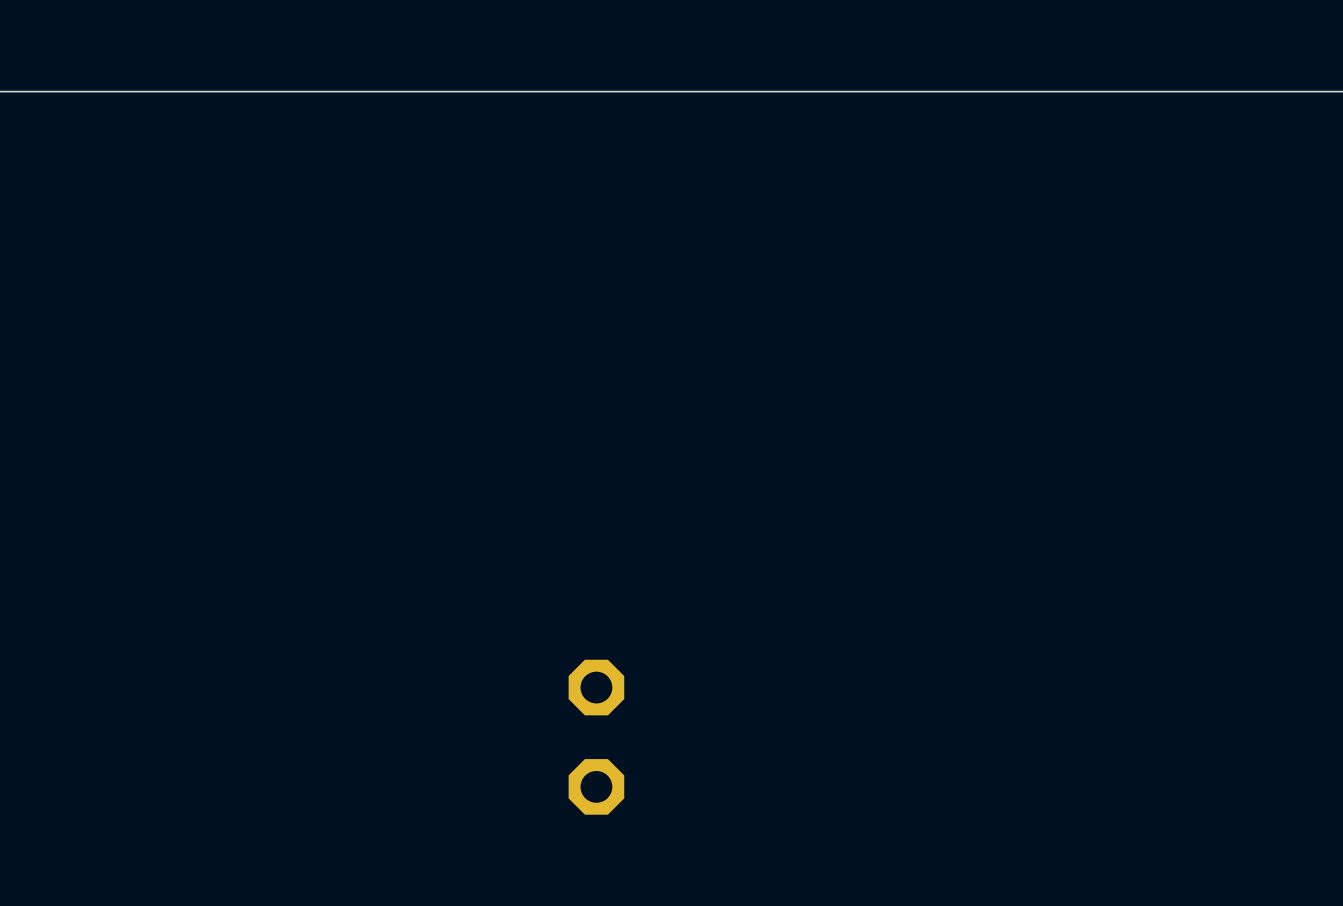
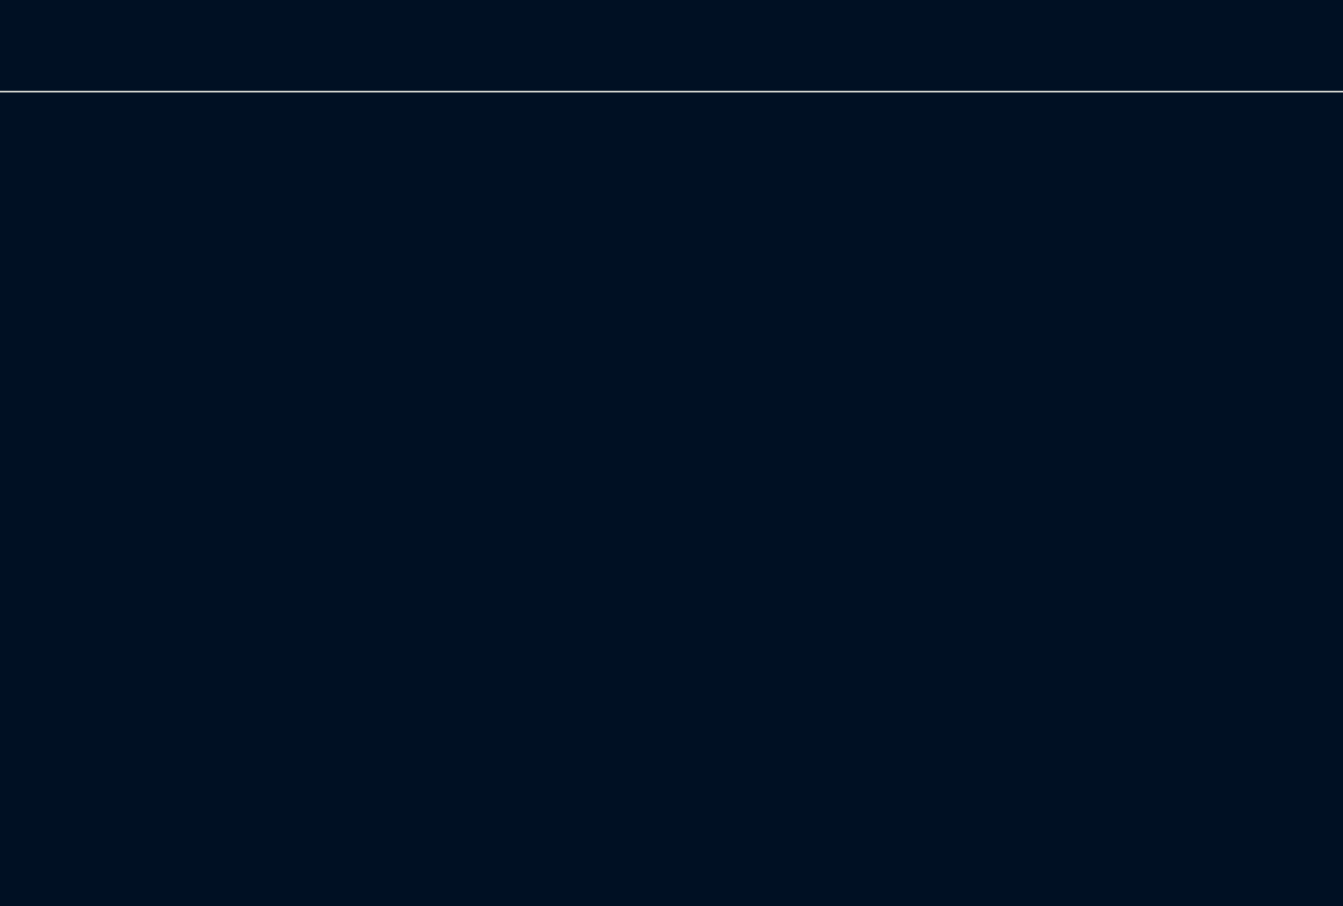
part: (596, 737) -> none

